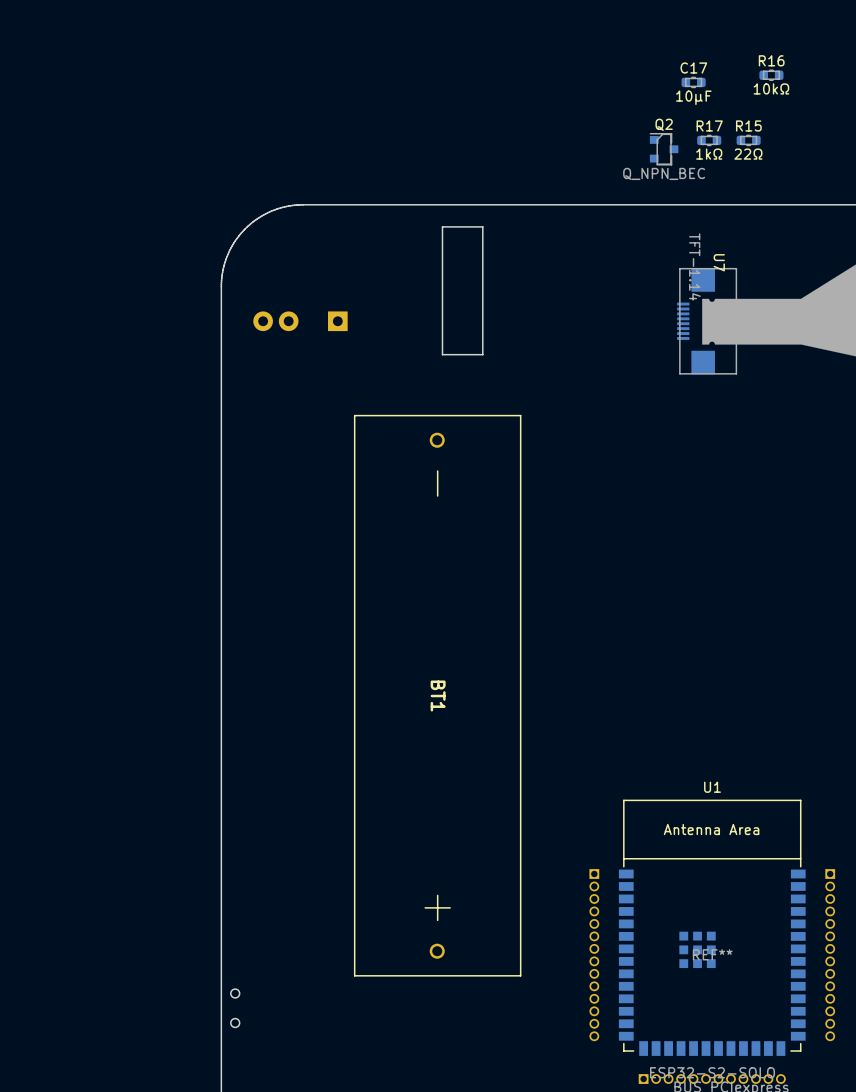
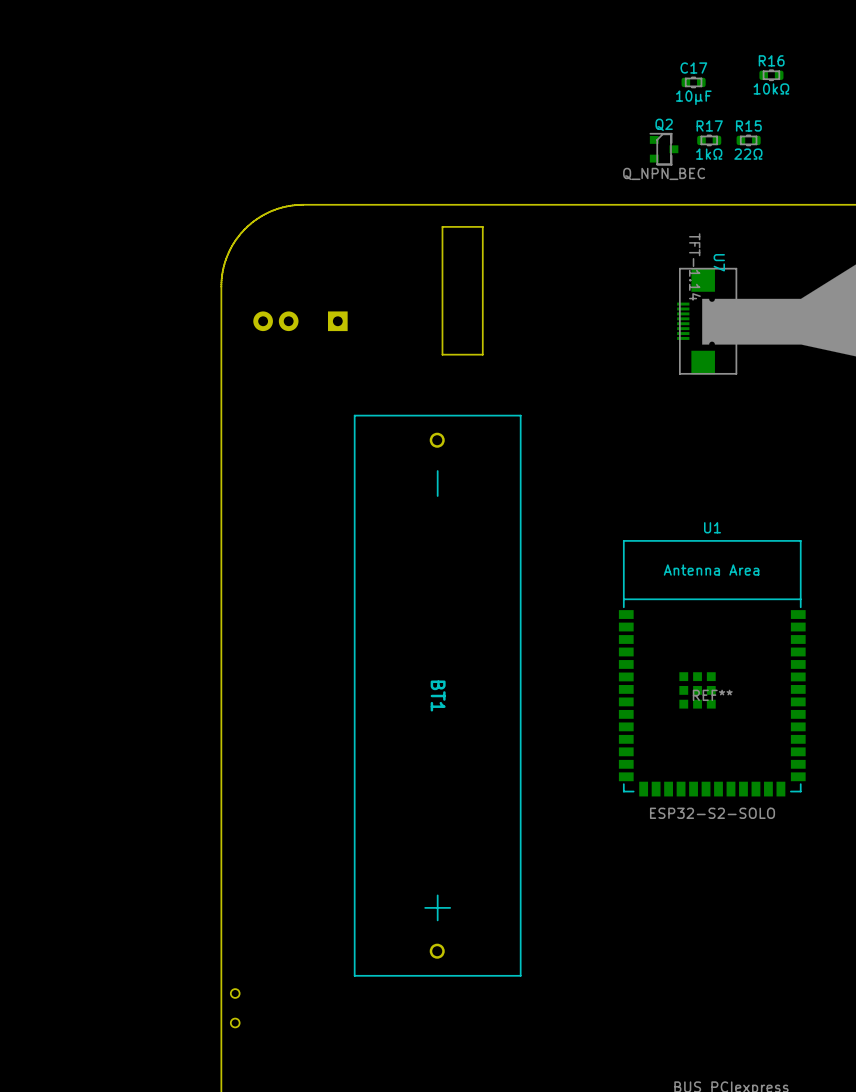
U1 position: (712, 927) -> (712, 668)
part: (594, 955) -> none
part: (830, 955) -> none
part: (712, 1079) -> none

